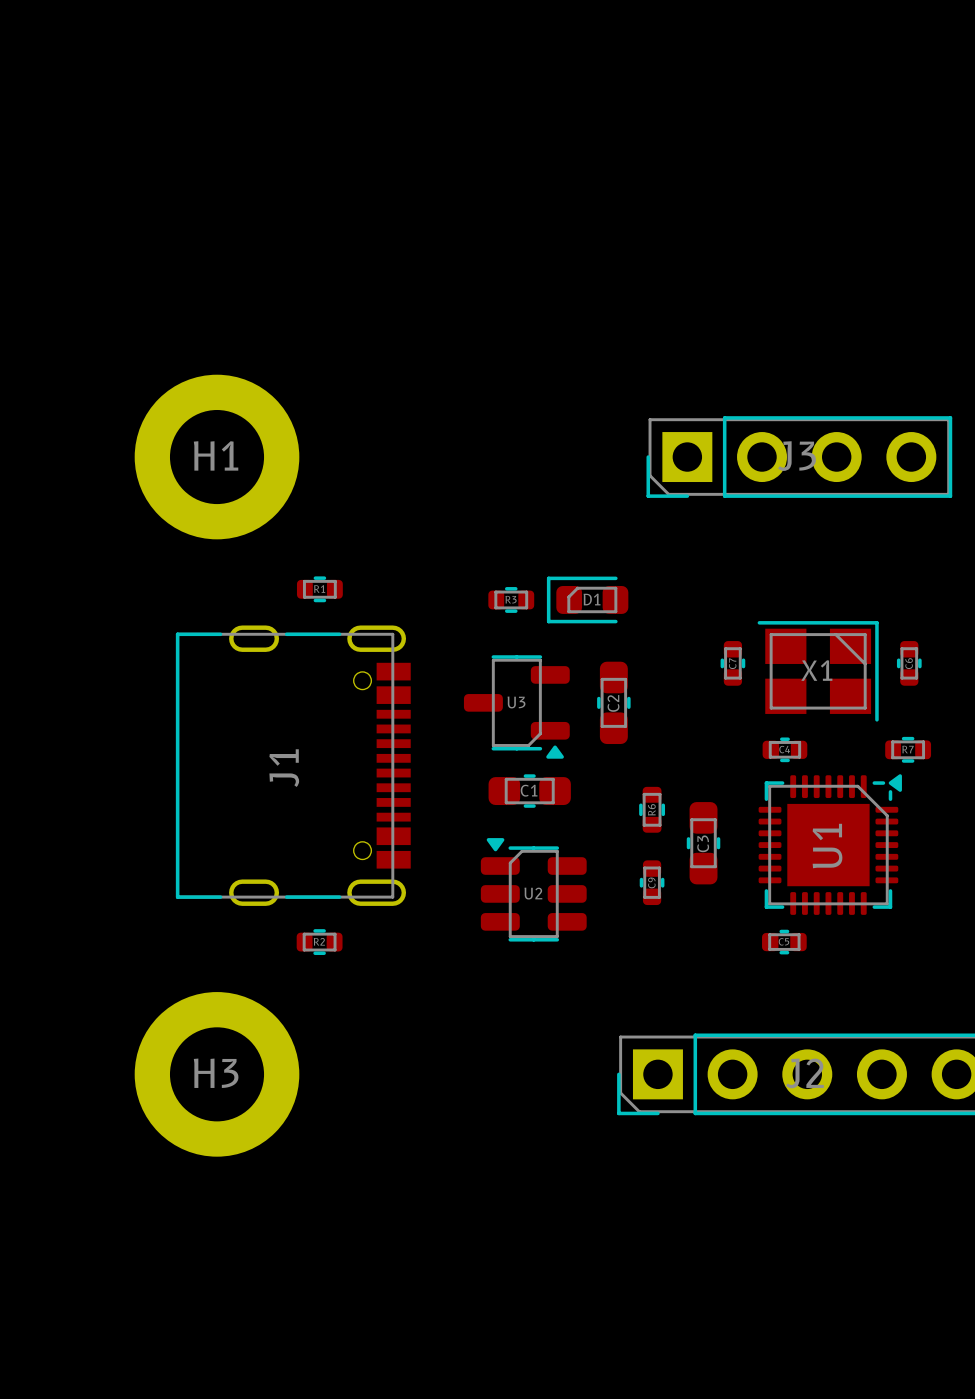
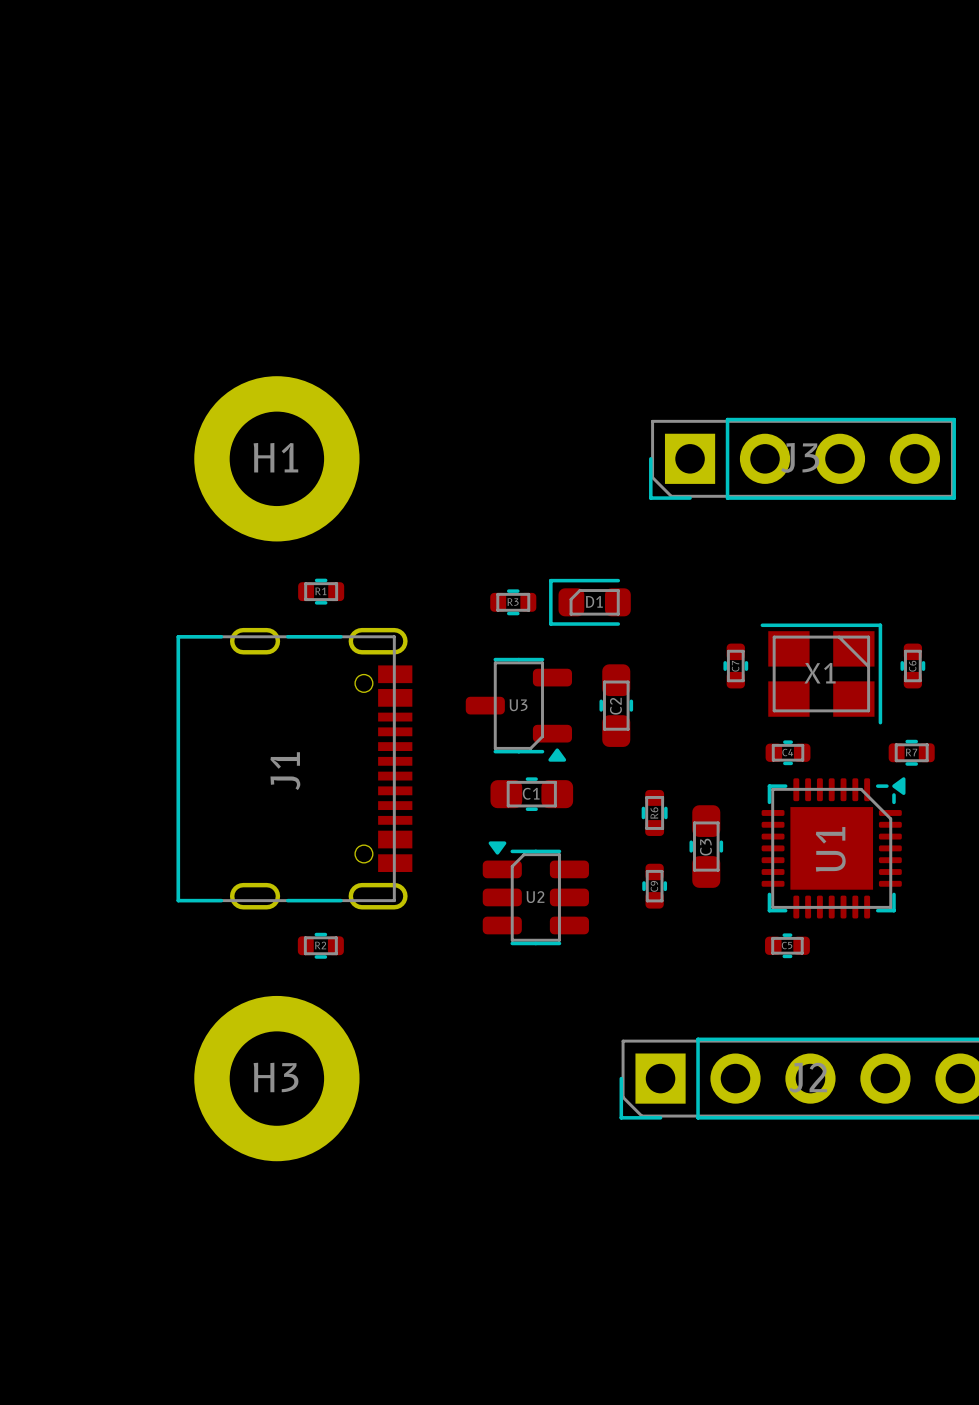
H1 position: (217, 457) -> (276, 458)
H3 position: (217, 1074) -> (276, 1078)

